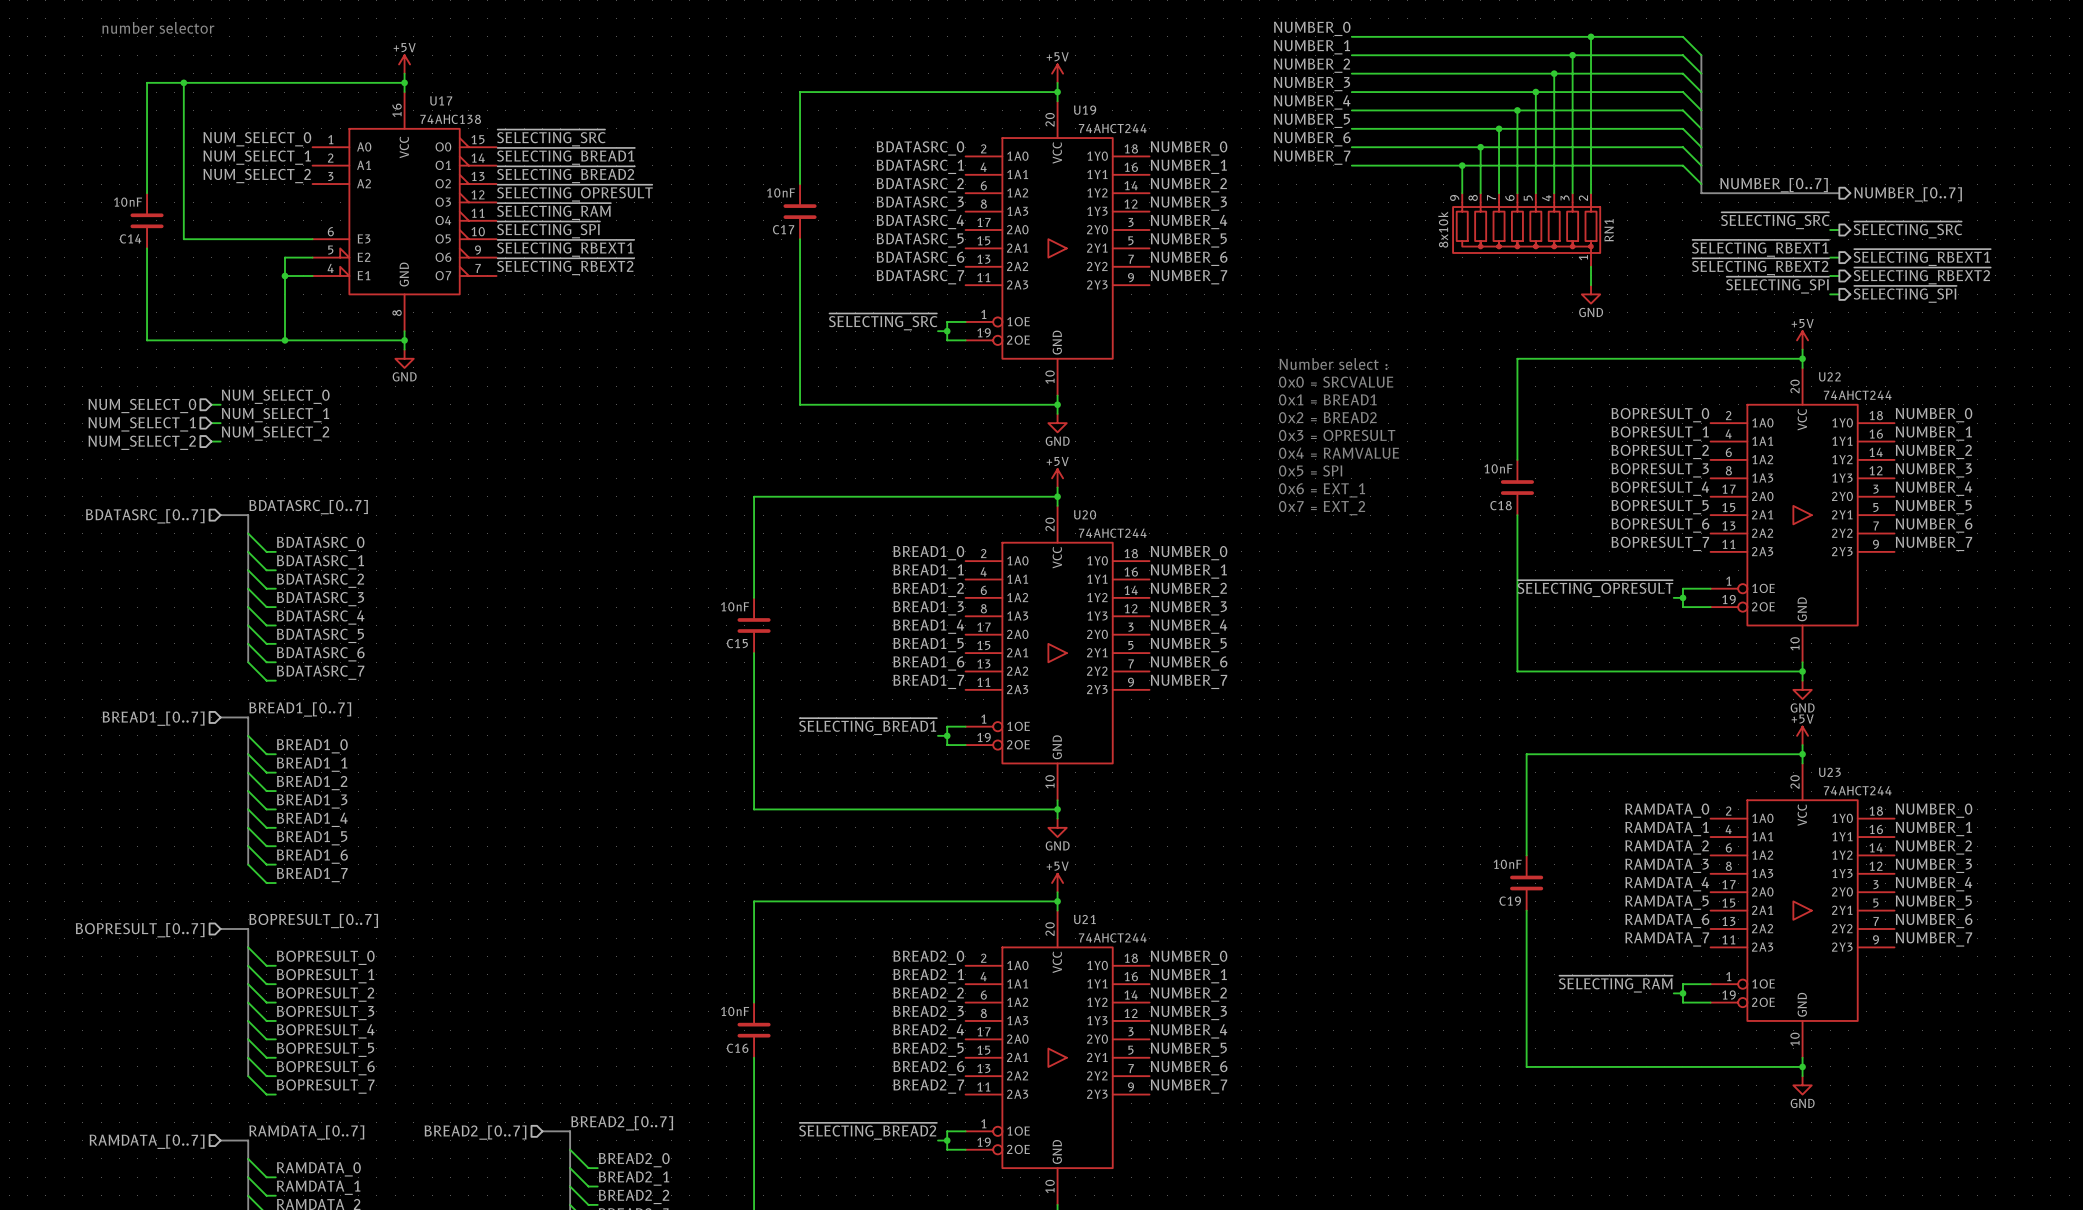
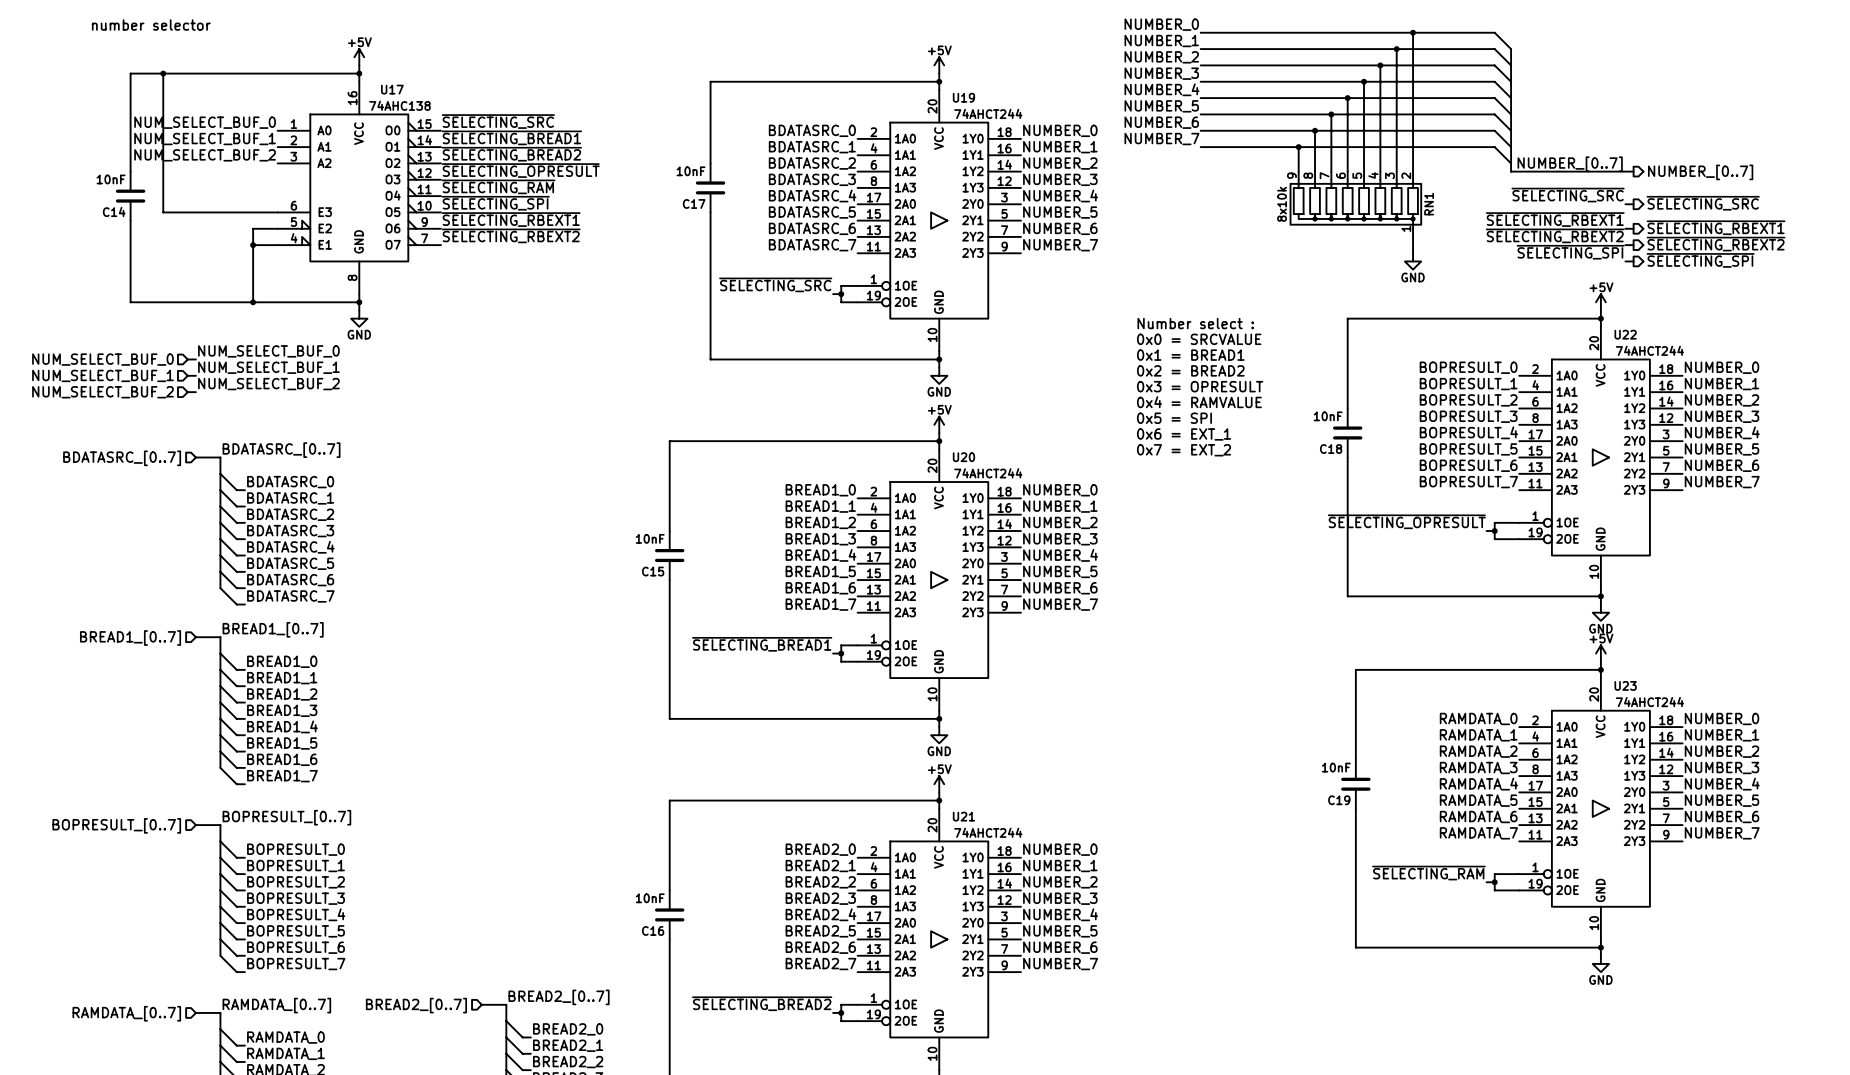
label: NUM_SELECT_0 (257, 139) -> NUM_SELECT_BUF_0 (205, 122)
label: NUM_SELECT_1 (257, 157) -> NUM_SELECT_BUF_1 (205, 139)
label: NUM_SELECT_2 (257, 176) -> NUM_SELECT_BUF_2 (205, 155)
label: NUM_SELECT_0 (275, 396) -> NUM_SELECT_BUF_0 (268, 351)
hierarchical label: NUM_SELECT_0 (142, 405) -> NUM_SELECT_BUF_0 (102, 359)
label: NUM_SELECT_1 (275, 415) -> NUM_SELECT_BUF_1 (268, 367)
hierarchical label: NUM_SELECT_1 (142, 424) -> NUM_SELECT_BUF_1 (102, 375)
label: NUM_SELECT_2 (275, 433) -> NUM_SELECT_BUF_2 (268, 384)
hierarchical label: NUM_SELECT_2 (142, 442) -> NUM_SELECT_BUF_2 (102, 392)

